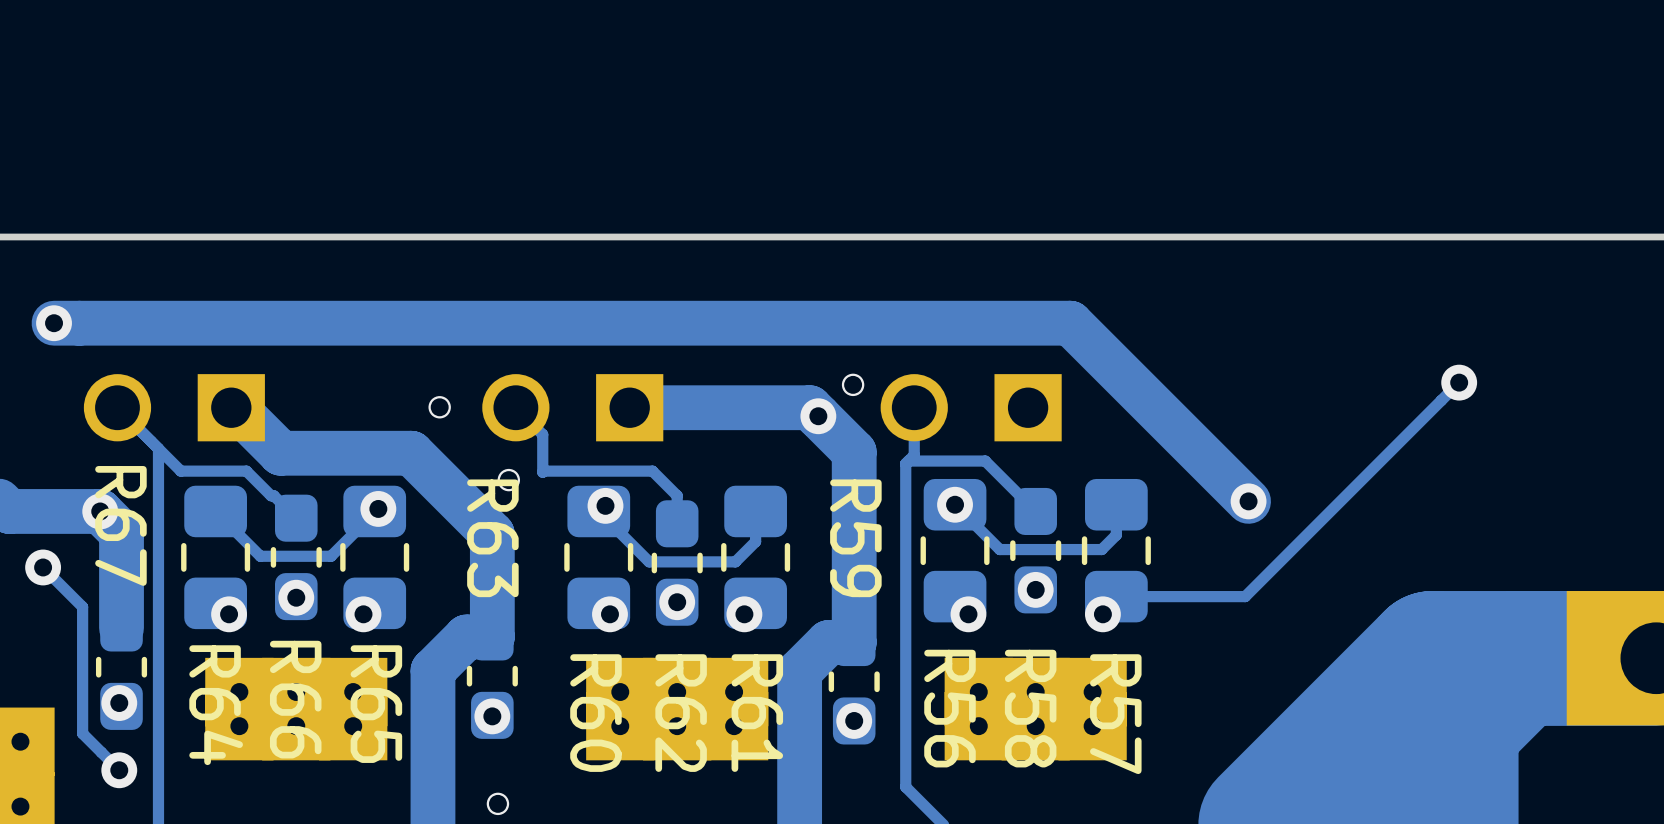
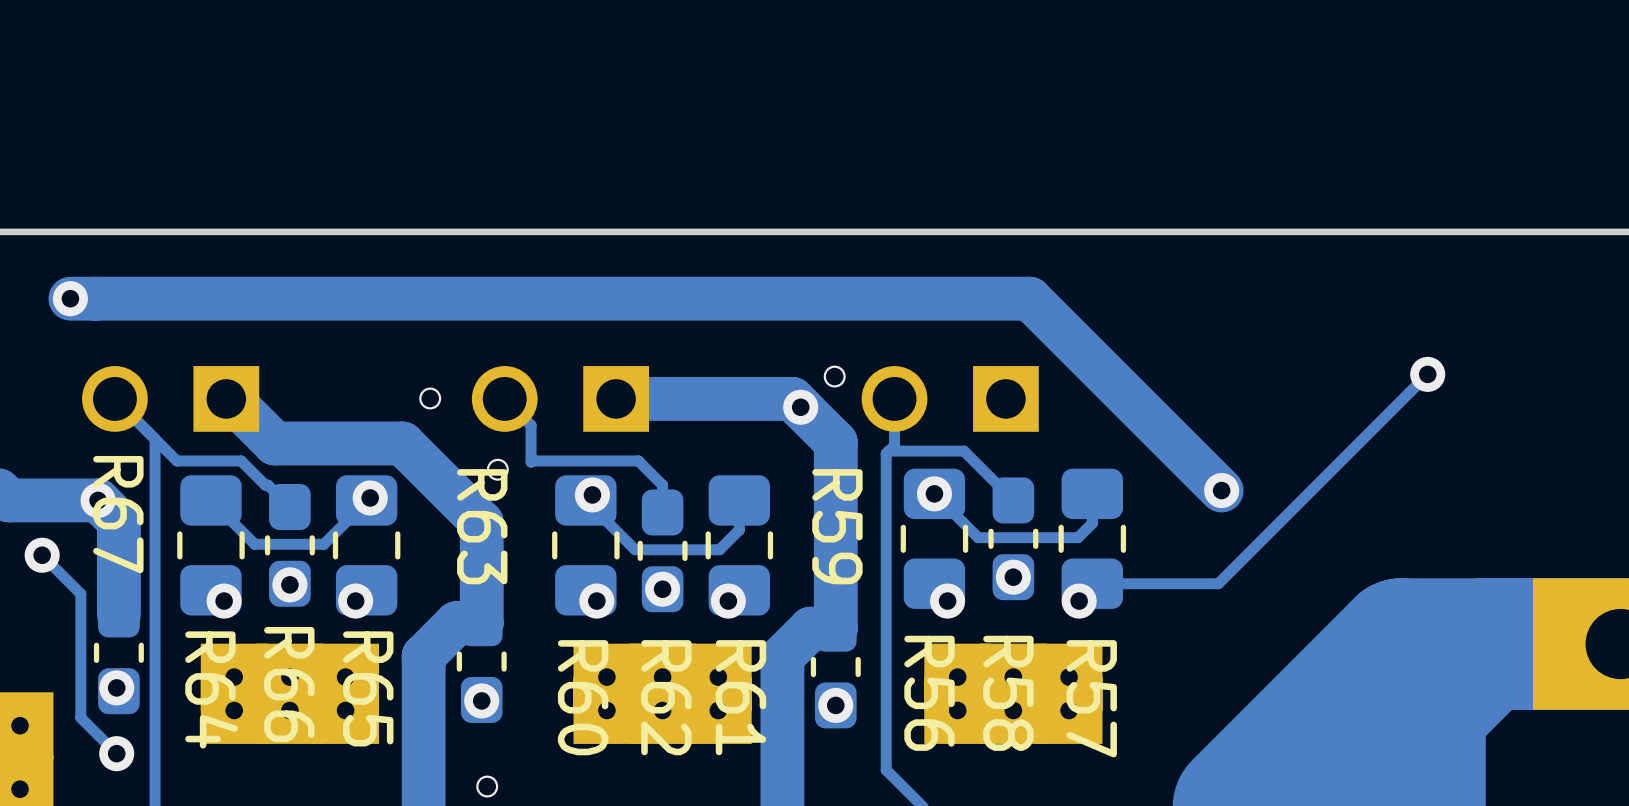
via position: (54, 323) -> (70, 298)
track: (1070, 323) (54, 323) -> (1047, 316) (1029, 298) (70, 298)

